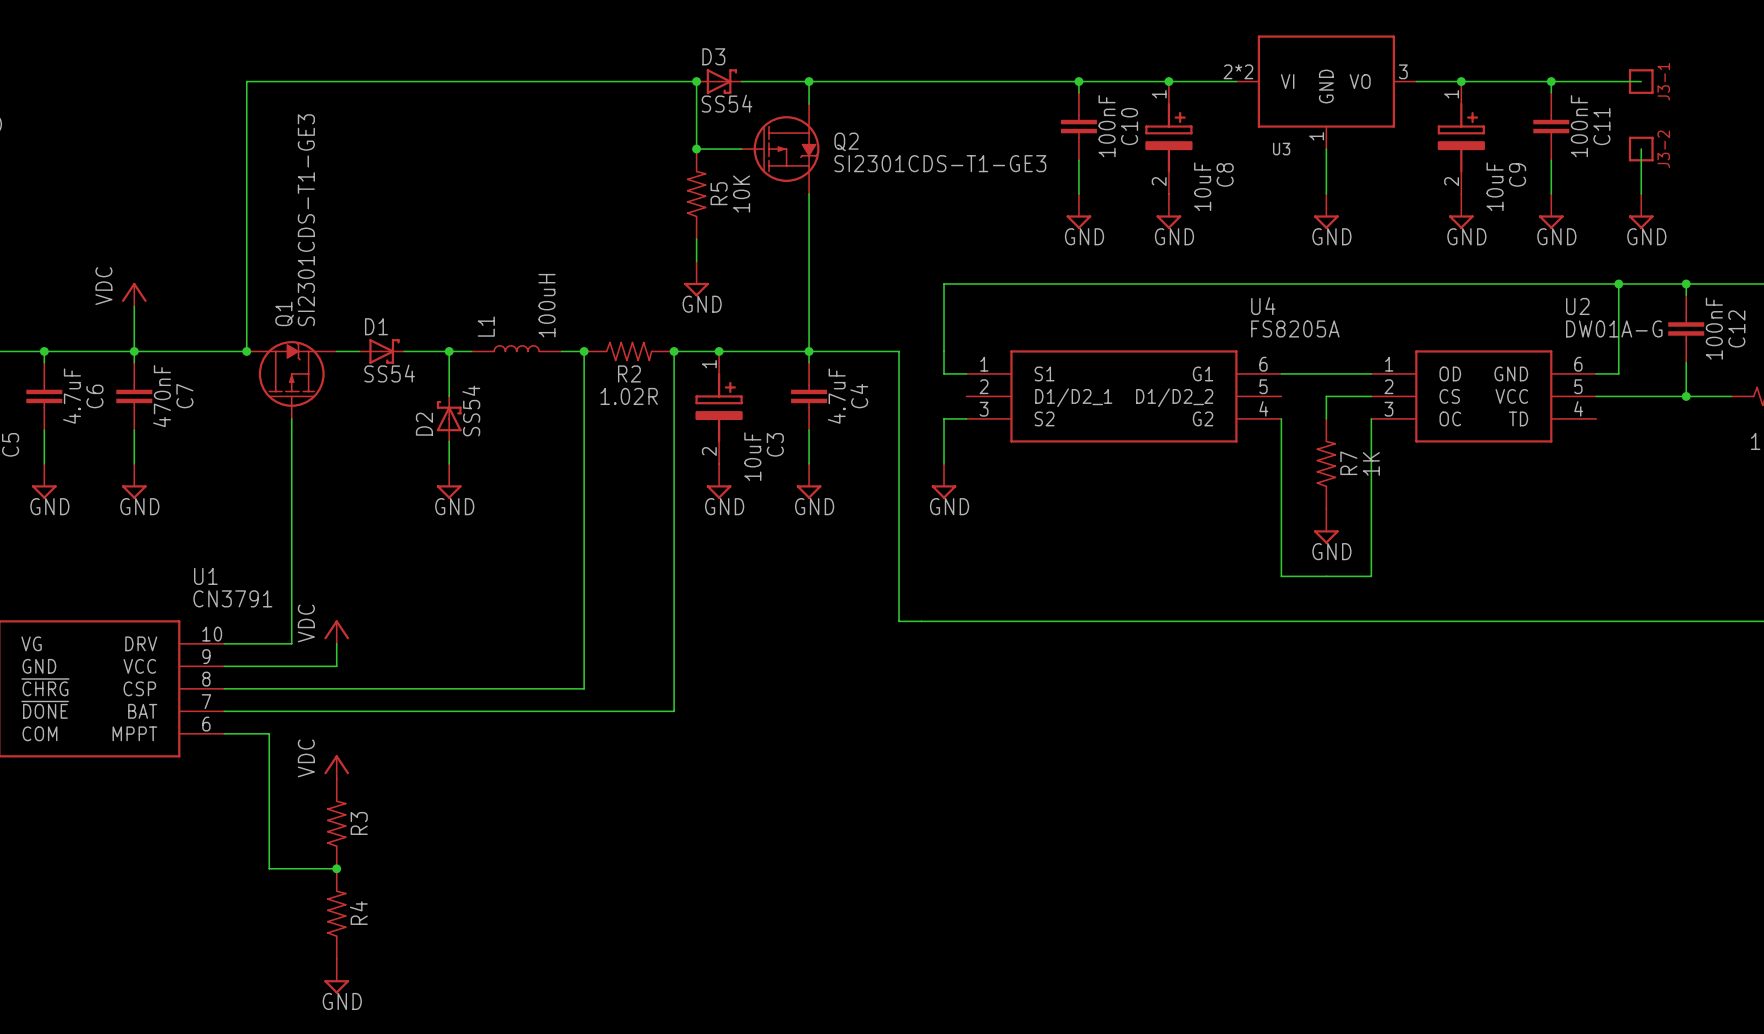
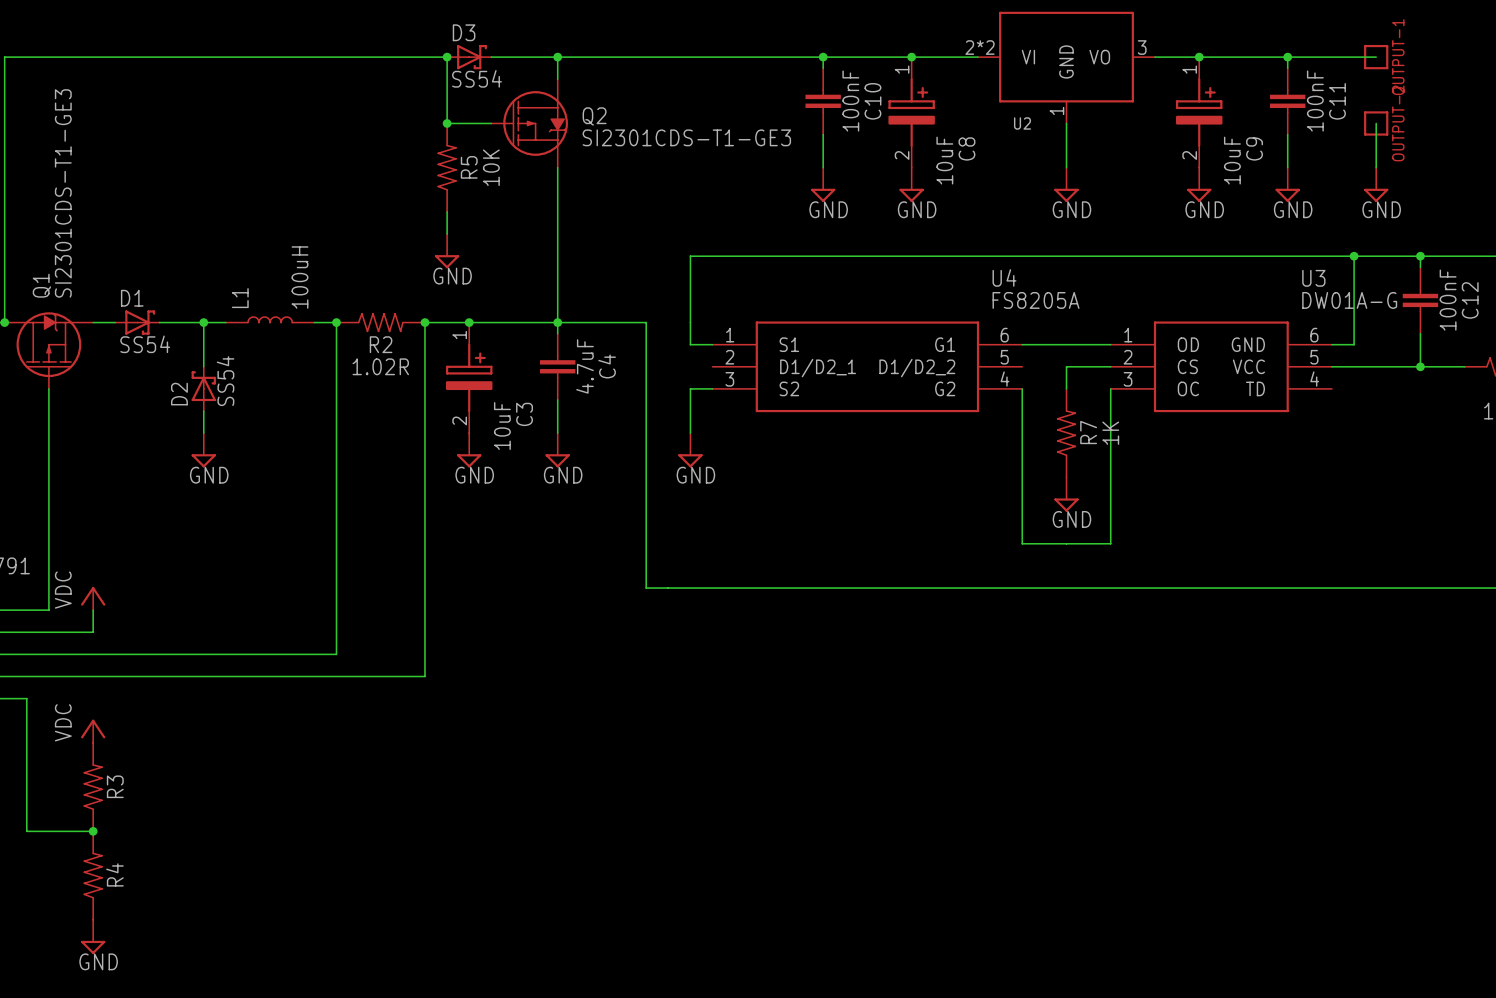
J3-1 name: J3-1 (1663, 81) -> OUTPUT-1 (1398, 57)
U3 name: U3 (1281, 149) -> U2 (1022, 123)
J3-2 name: J3-2 (1663, 149) -> OUTPUT-2 (1398, 123)
U2 name: U2 (1577, 306) -> U3 (1313, 278)

